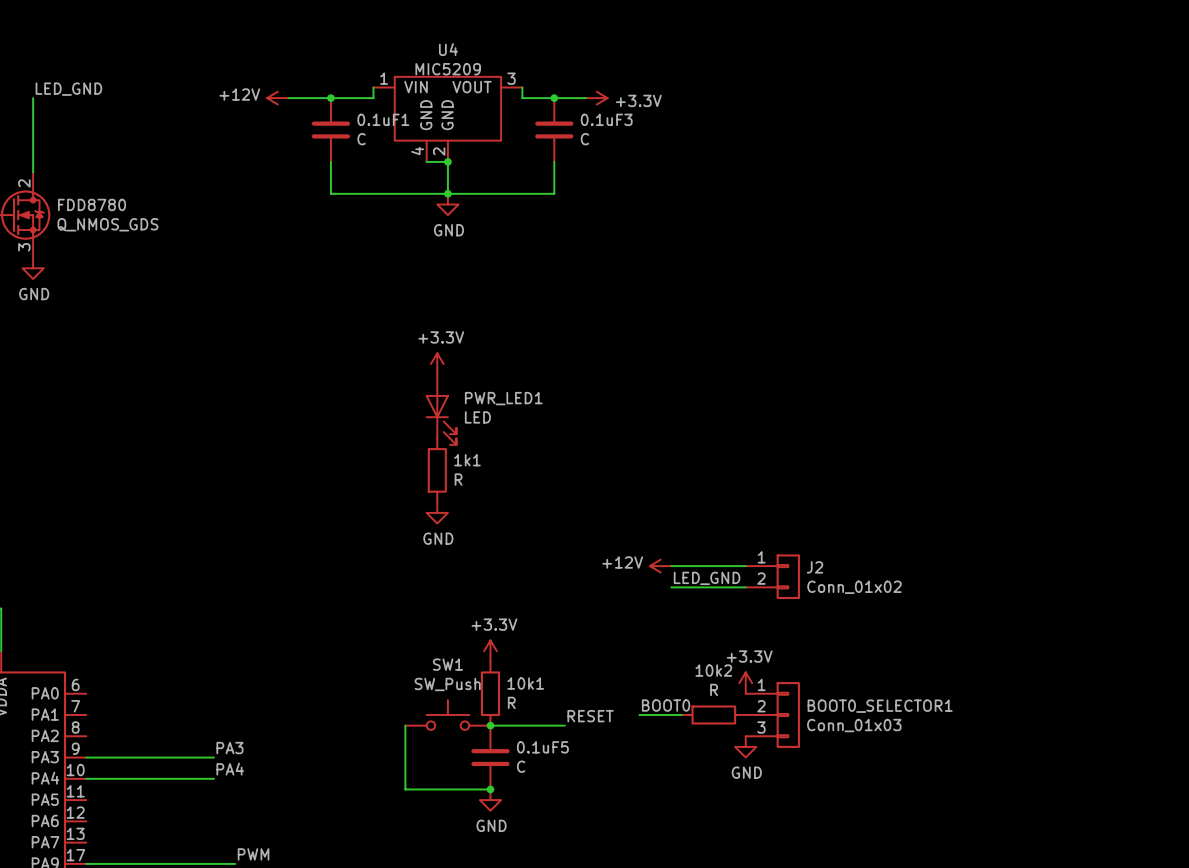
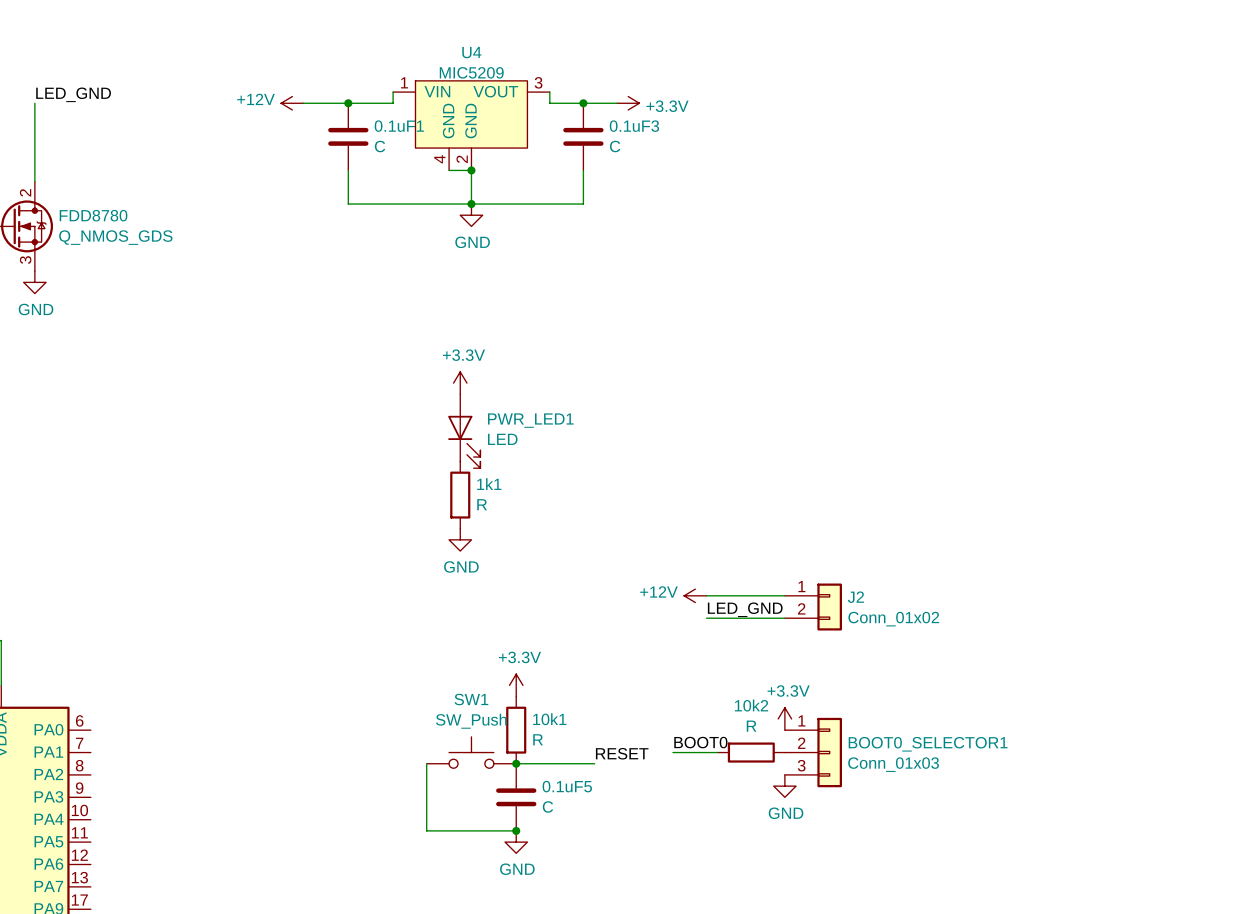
label: PA3 (229, 748) -> none
wire: (86, 757) (213, 757) -> none
label: PA4 (230, 769) -> none
wire: (86, 778) (213, 778) -> none
label: PWM (253, 854) -> none
wire: (86, 863) (235, 863) -> none

